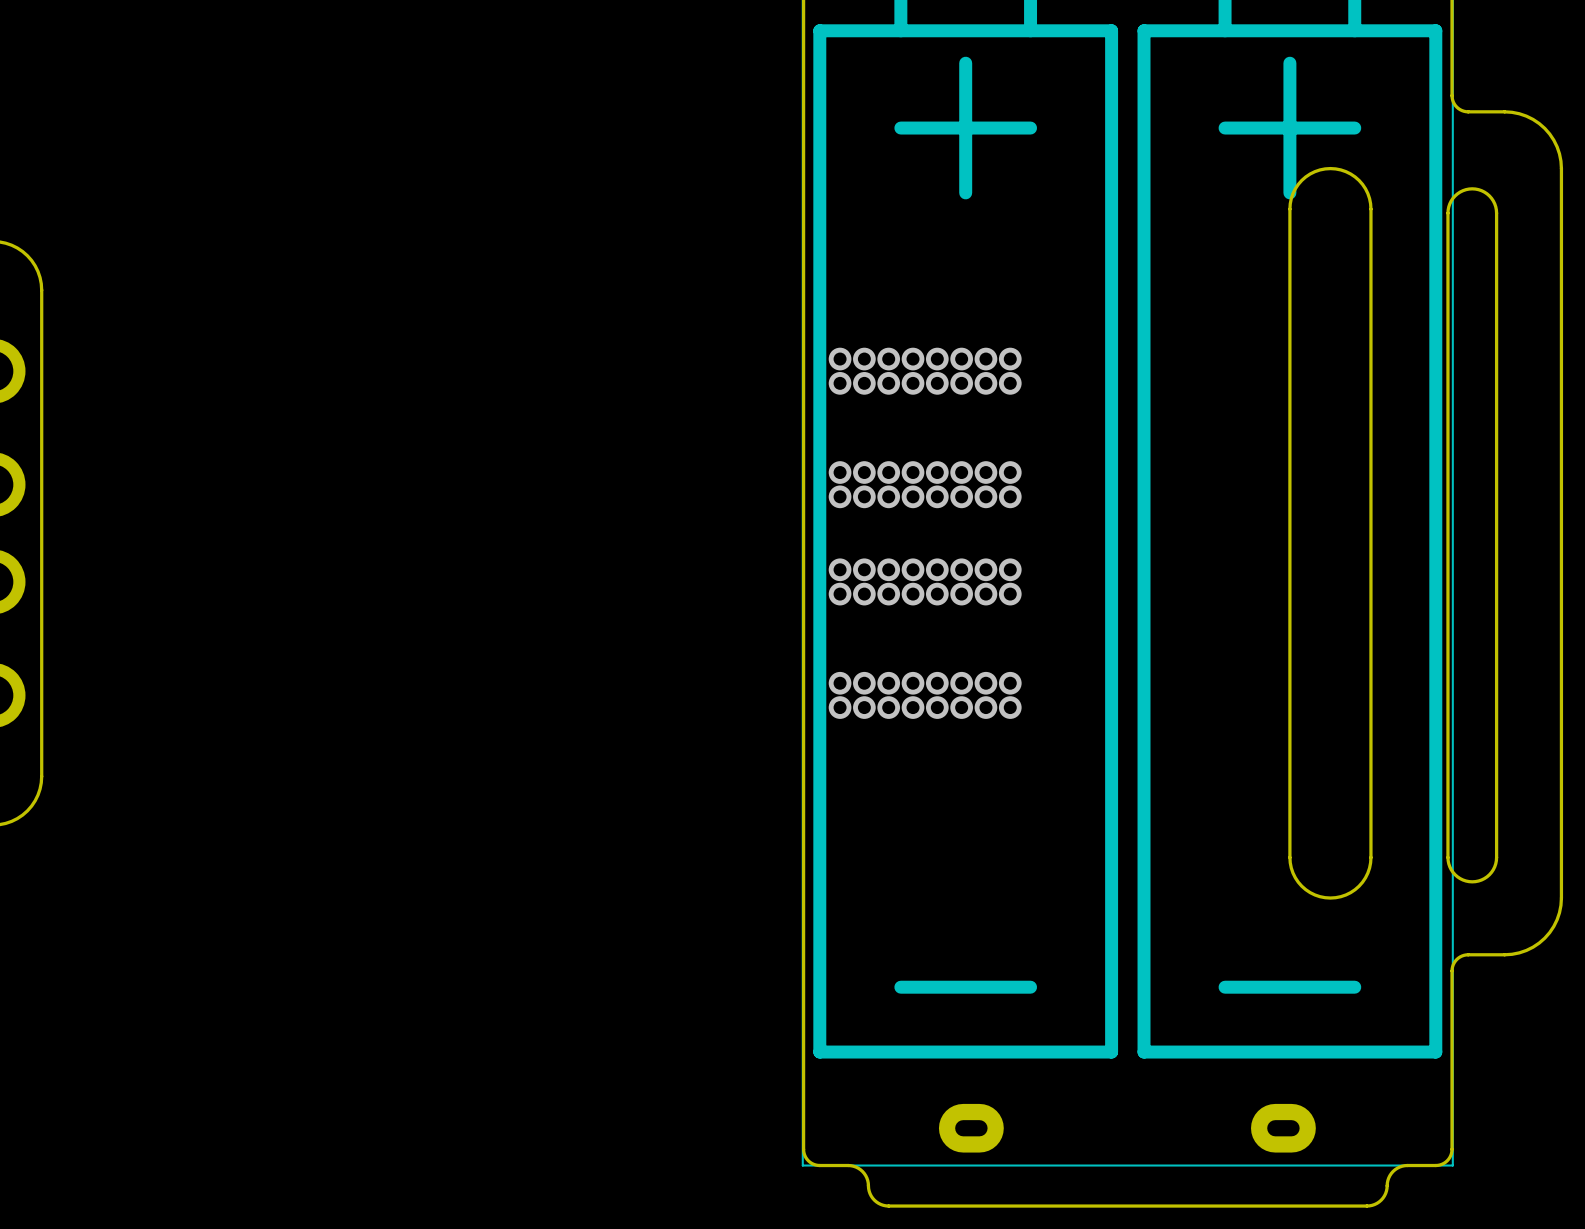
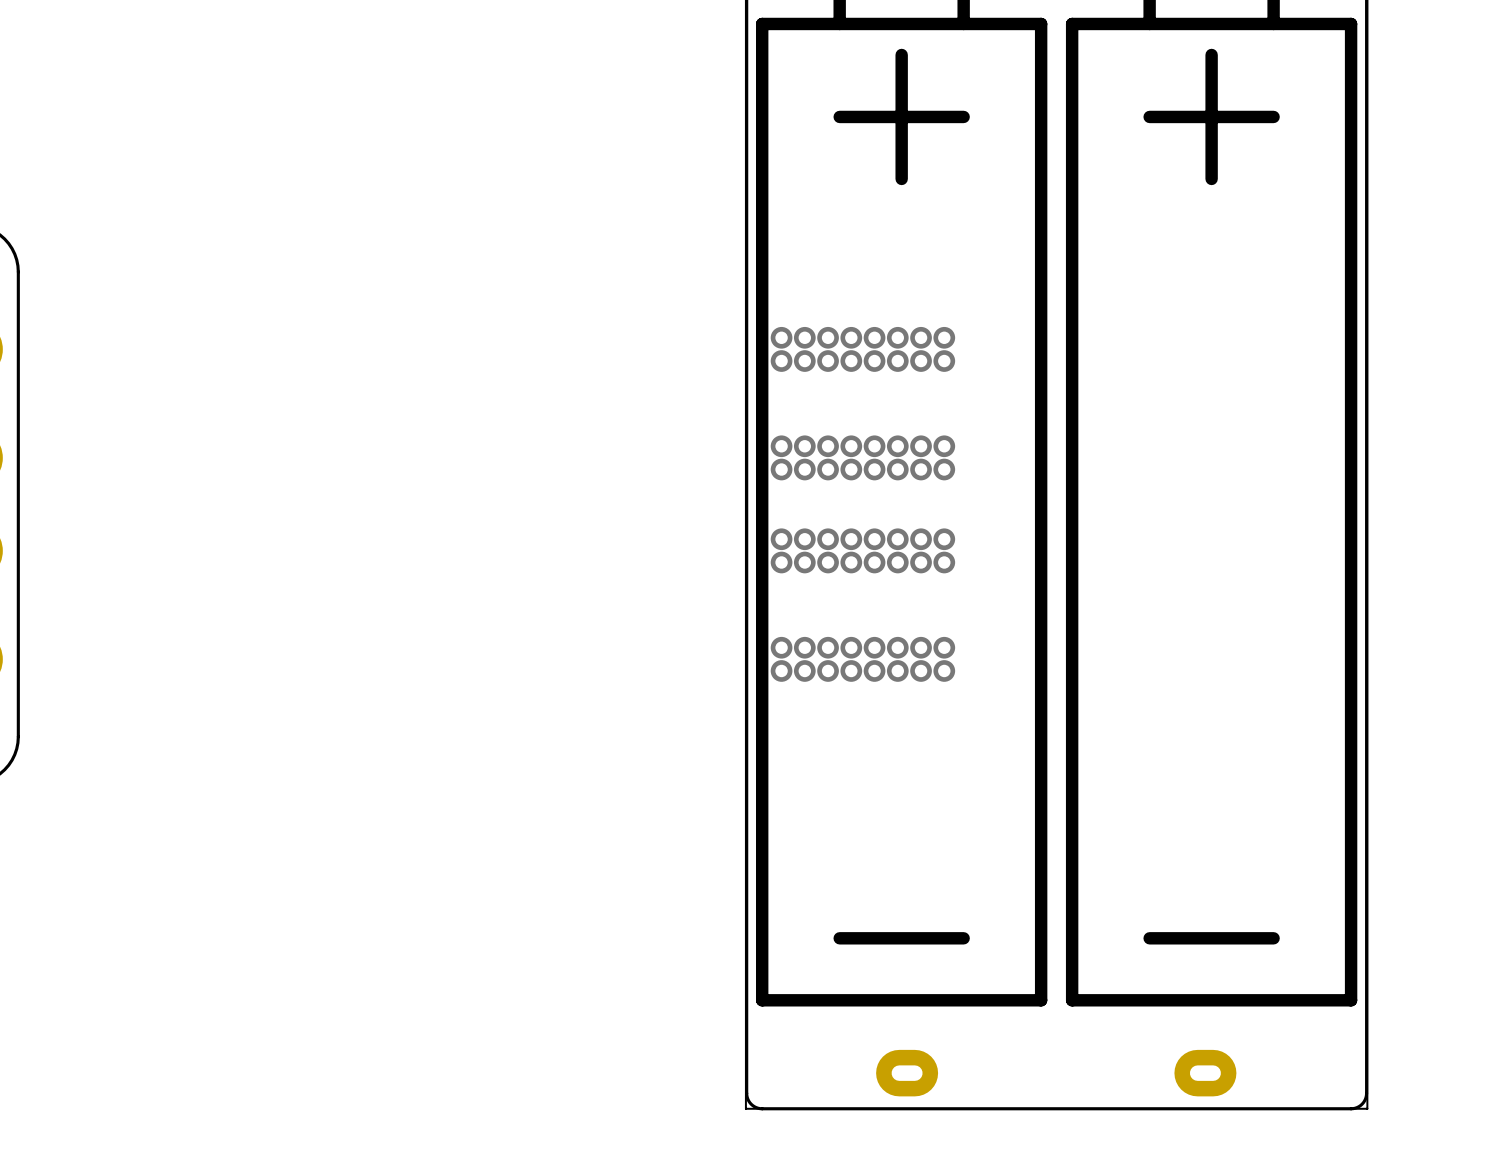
board edge: (1452, 95) (1455, 105) (1464, 111) (1512, 112) (1533, 119) (1544, 128) (1553, 140) (1559, 153) (1561, 168) (1560, 905) (1553, 926) (1544, 938) (1533, 947) (1512, 954) (1464, 955) (1455, 961) (1452, 970) -> (1366, 85) (1366, 922)
board edge: (1370, 209) (1370, 857) (1367, 873) (1359, 886) (1345, 894) (1330, 898) (1314, 894) (1301, 886) (1292, 873) (1289, 857) (1289, 209) (1292, 193) (1301, 180) (1314, 171) (1330, 168) (1345, 171) (1359, 180) (1367, 193) (1370, 209) -> none
board edge: (1496, 213) (1496, 857) (1494, 866) (1489, 874) (1481, 879) (1472, 881) (1462, 879) (1455, 874) (1449, 866) (1447, 857) (1447, 213) (1449, 203) (1455, 195) (1462, 190) (1472, 188) (1481, 190) (1489, 195) (1494, 203) (1496, 213) -> none
board edge: (1407, 1165) (1399, 1167) (1393, 1171) (1388, 1178) (1382, 1198) (1377, 1203) (1366, 1206) (886, 1205) (878, 1203) (872, 1198) (866, 1178) (862, 1171) (855, 1167) (848, 1165) -> (1323, 1108) (789, 1108)

